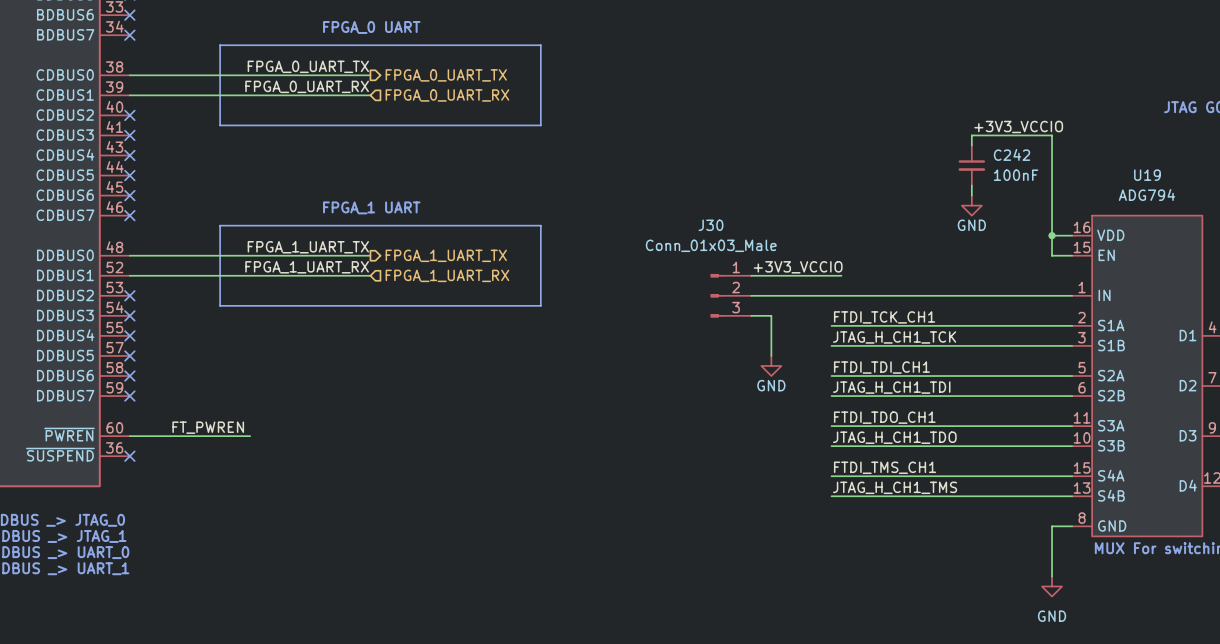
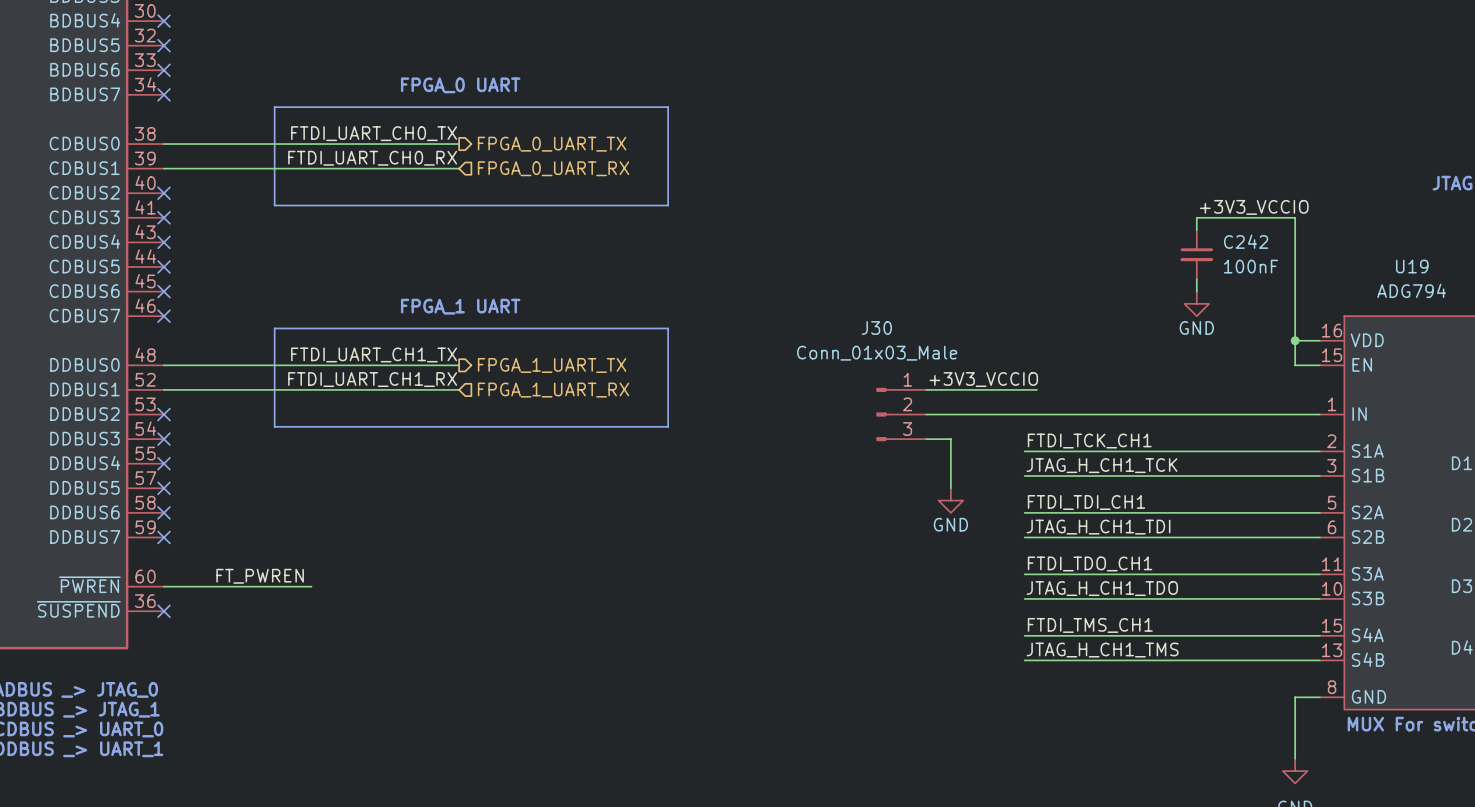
label: FPGA_0_UART_TX (308, 66) -> FTDI_UART_CH0_TX (374, 133)
label: FPGA_0_UART_RX (307, 86) -> FTDI_UART_CH0_RX (372, 158)
label: FPGA_1_UART_TX (308, 247) -> FTDI_UART_CH1_TX (374, 354)
label: FPGA_1_UART_RX (307, 267) -> FTDI_UART_CH1_RX (372, 379)

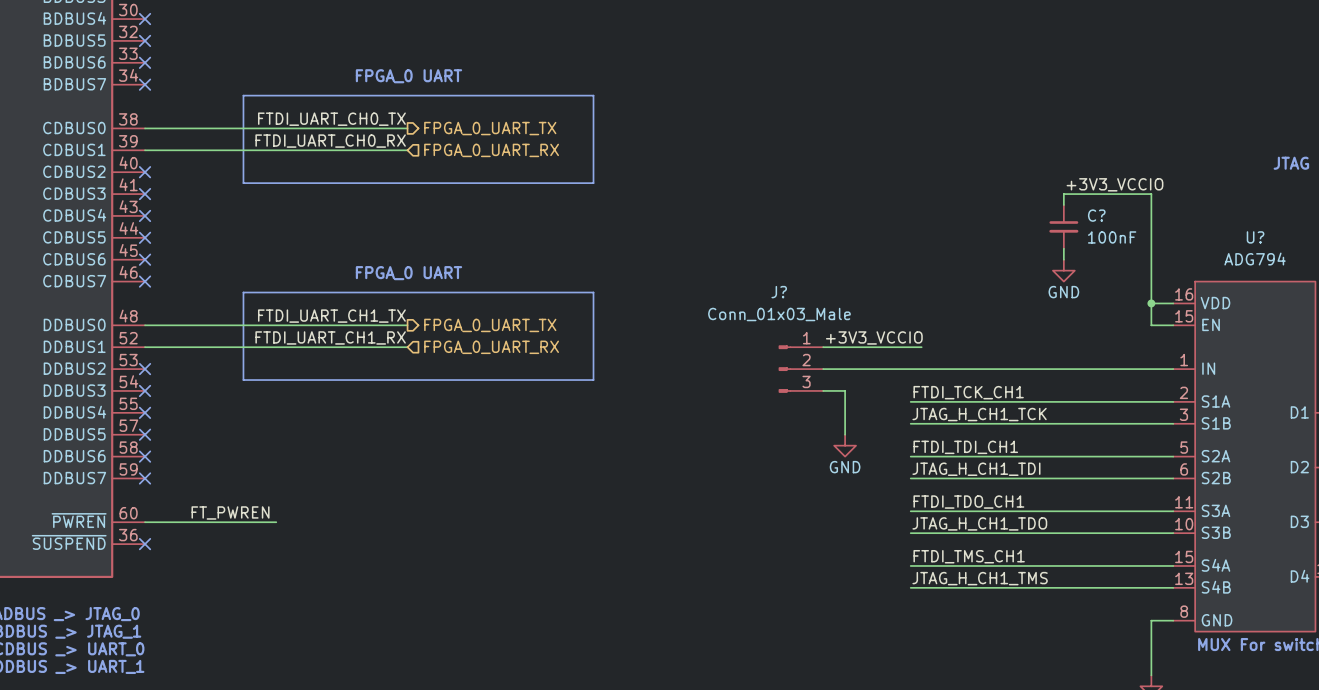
C242 name: C242 (1246, 241) -> C? (1096, 215)
U19 name: U19 (1412, 266) -> U? (1255, 237)
text: FPGA_1 UART (460, 306) -> FPGA_0 UART (408, 273)
J30 name: J30 (876, 328) -> J? (779, 292)
hierarchical label: FPGA_1_UART_TX (552, 365) -> FPGA_0_UART_TX (490, 325)
hierarchical label: FPGA_1_UART_RX (553, 390) -> FPGA_0_UART_RX (491, 347)

